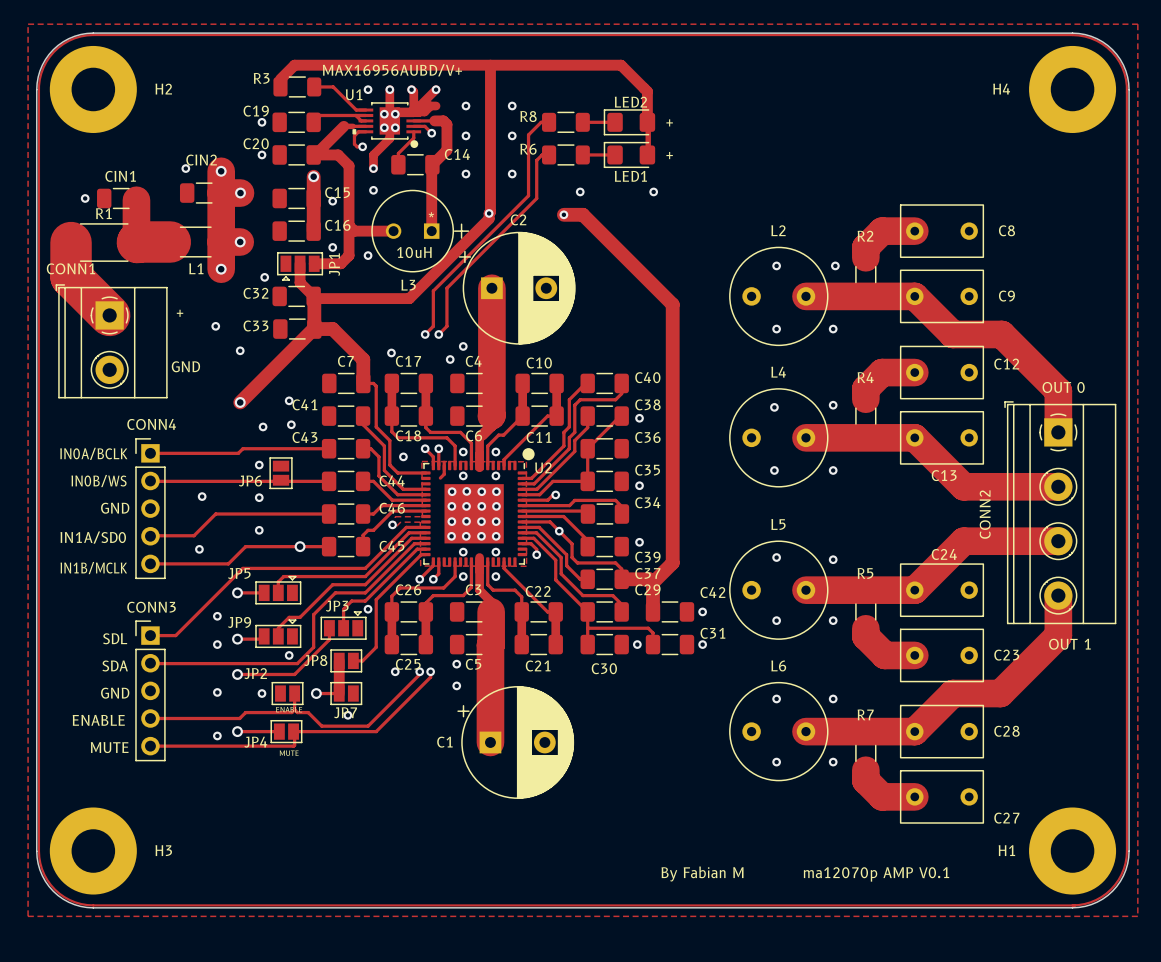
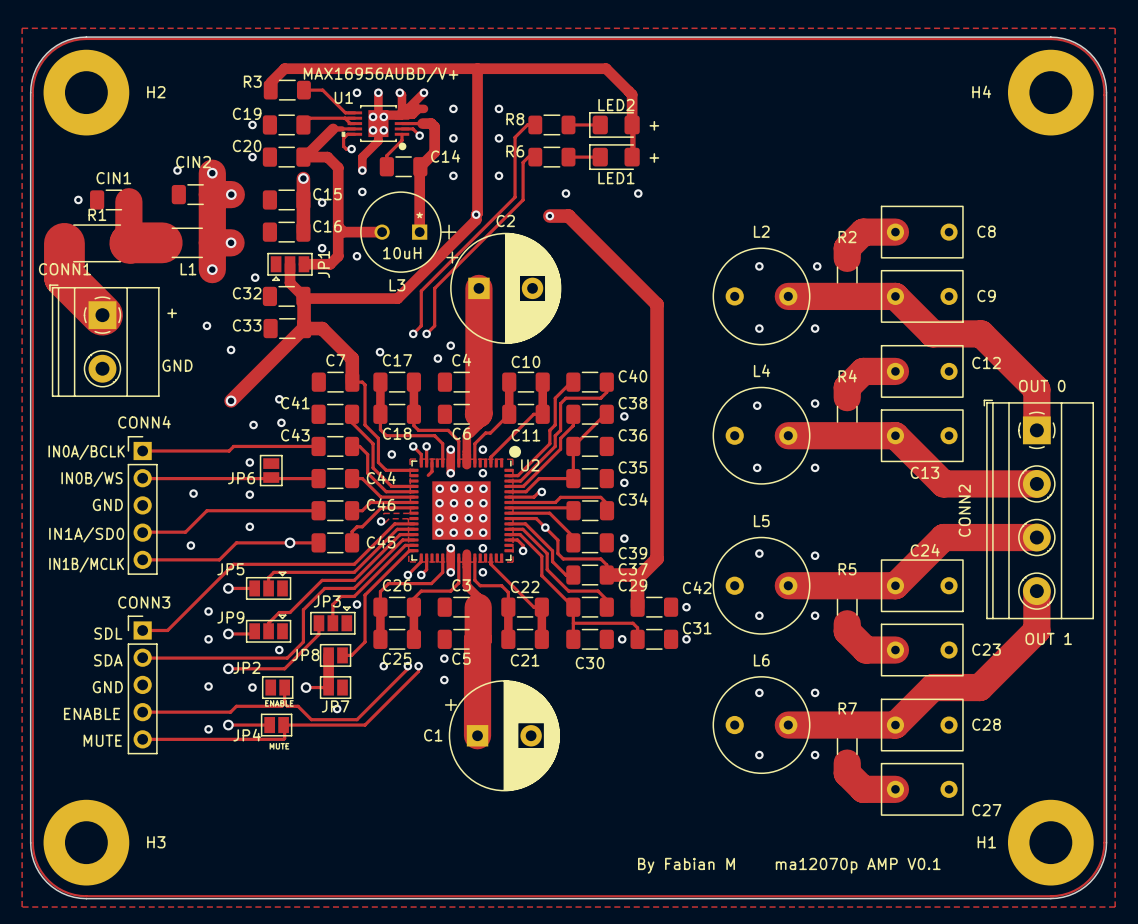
track: none -> (450, 449) (450, 473)
track: none -> (450, 548) (450, 572)

